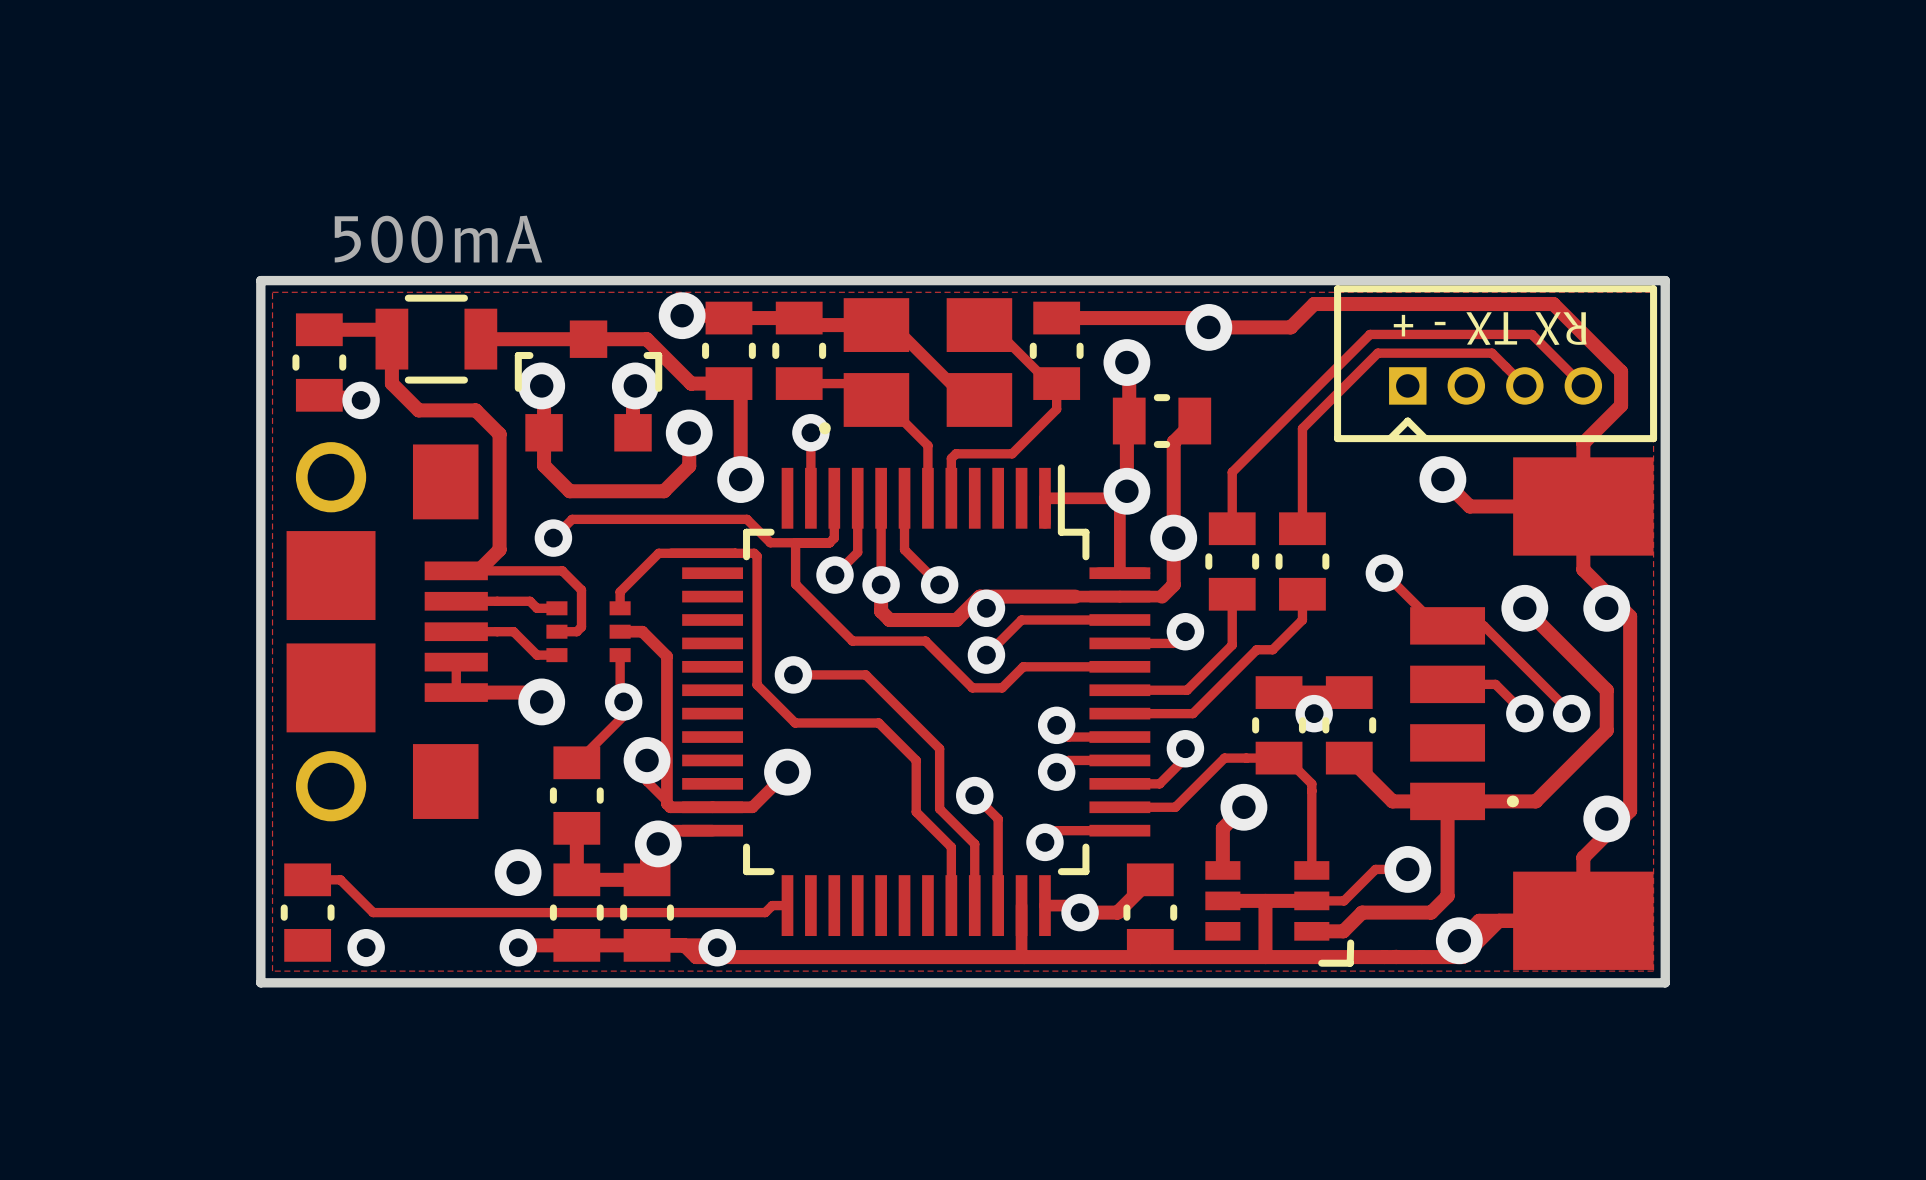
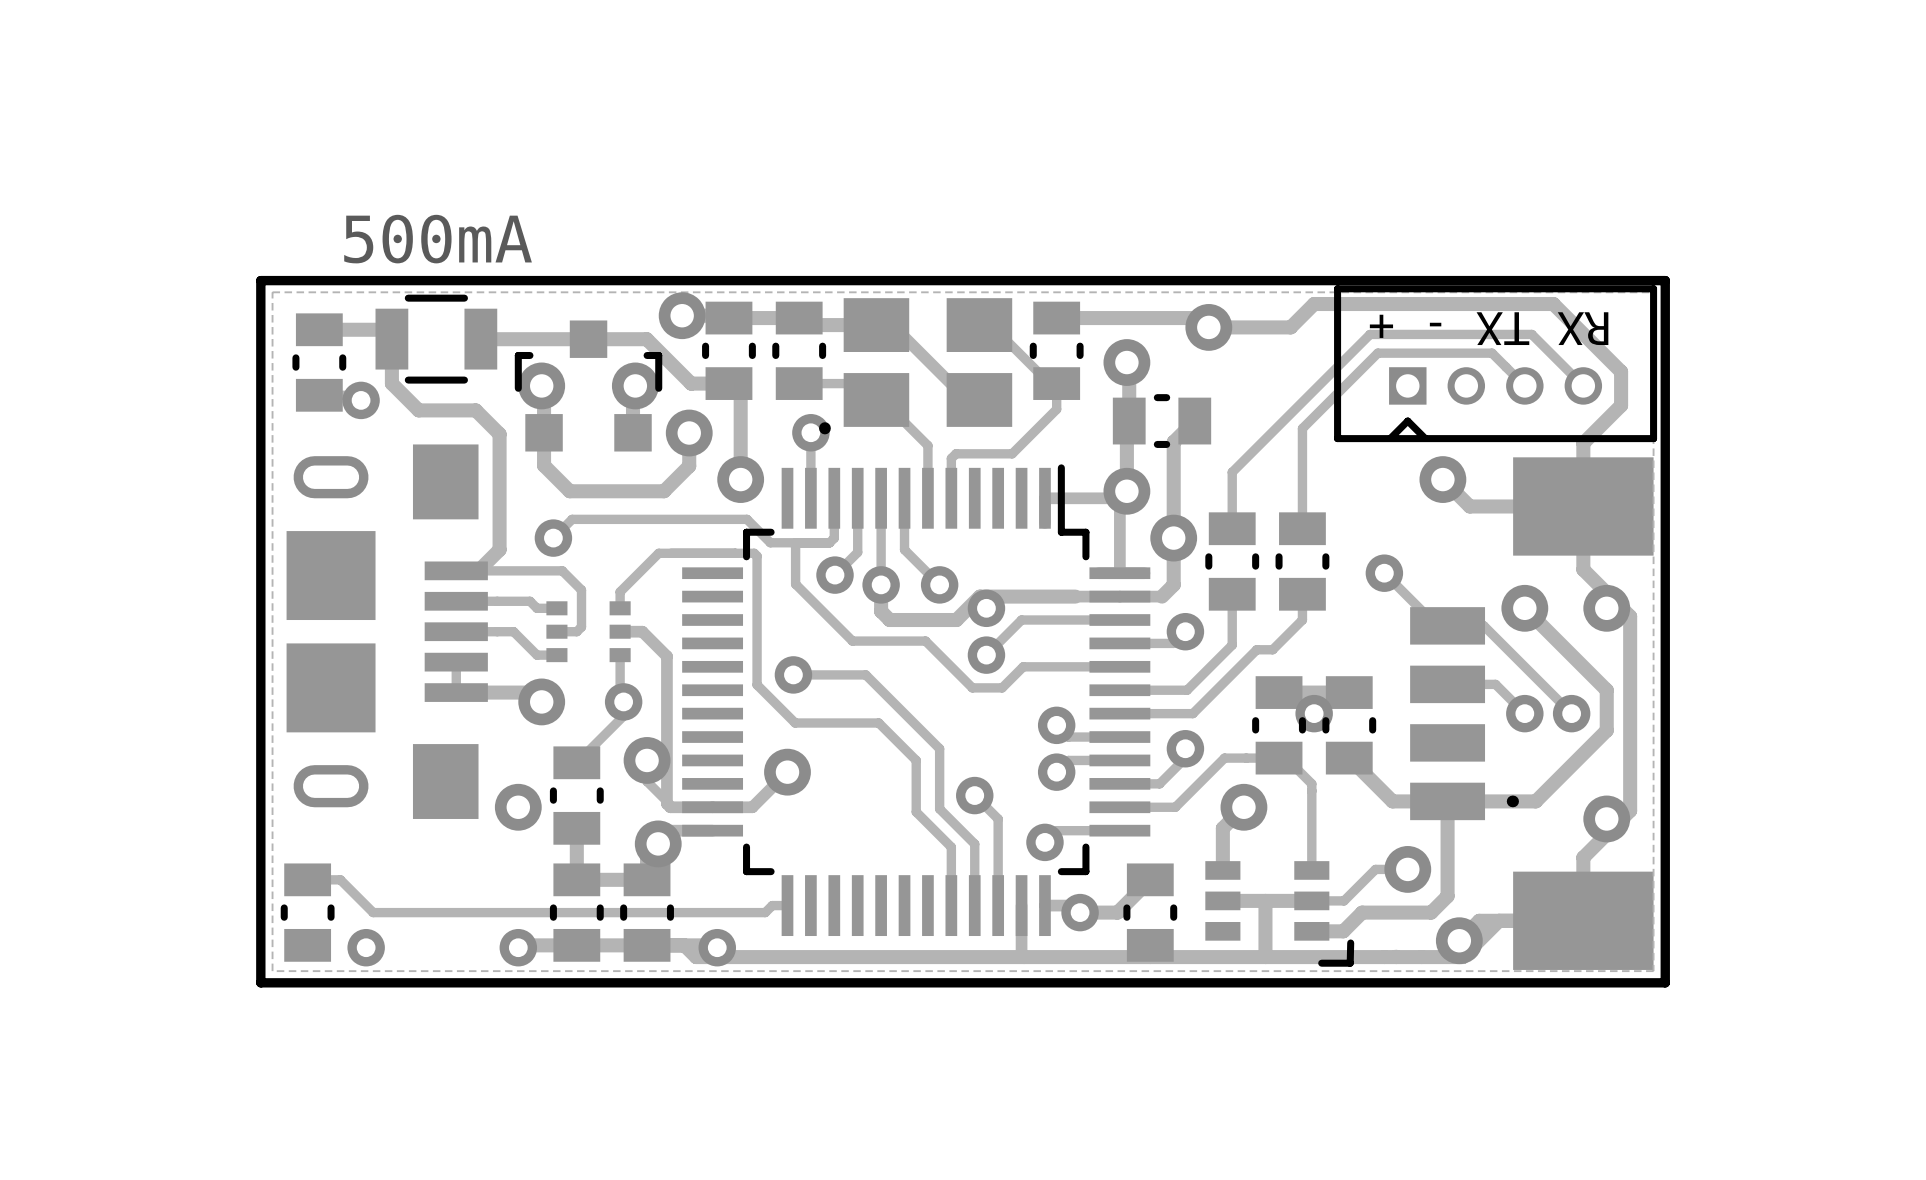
part footprint: [286, 442, 488, 822] -> [286, 444, 488, 819]
via position: (518, 872) -> (518, 807)

